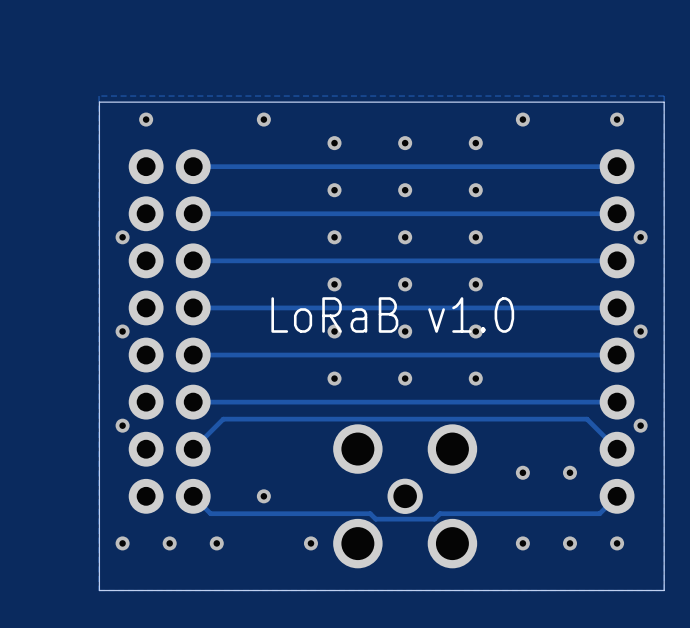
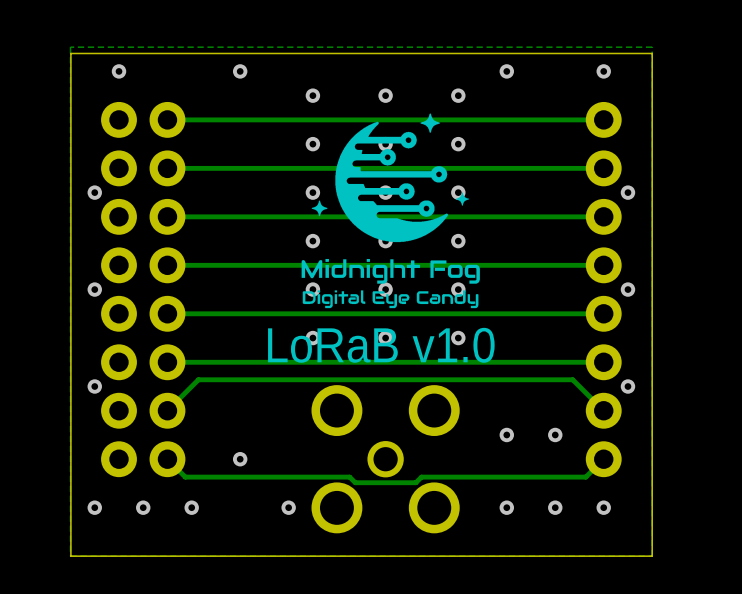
drawing: none -> [301, 113, 480, 309]
text position: LoRaB v1.0 (392, 315) -> LoRaB v1.0 (381, 345)

